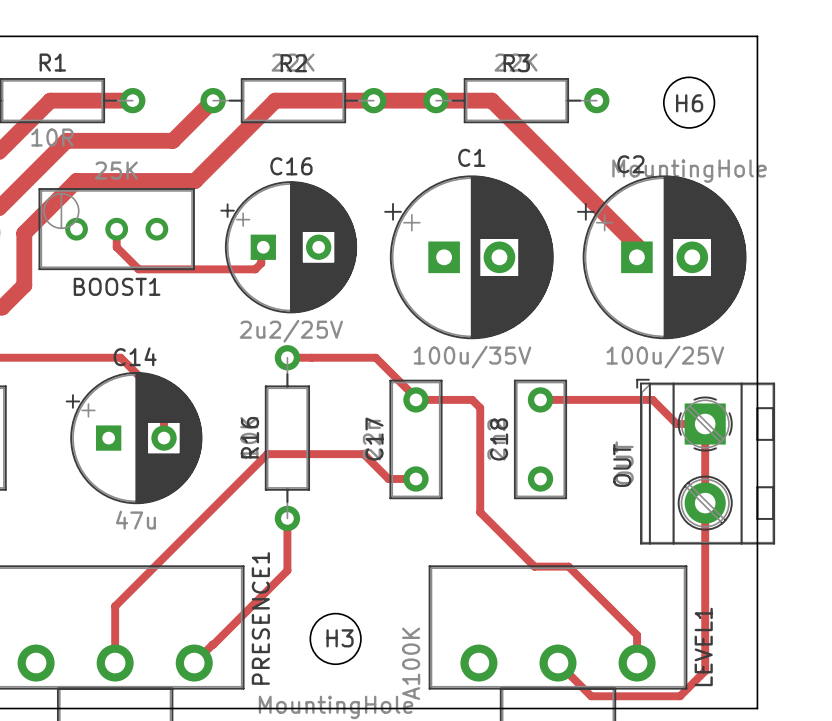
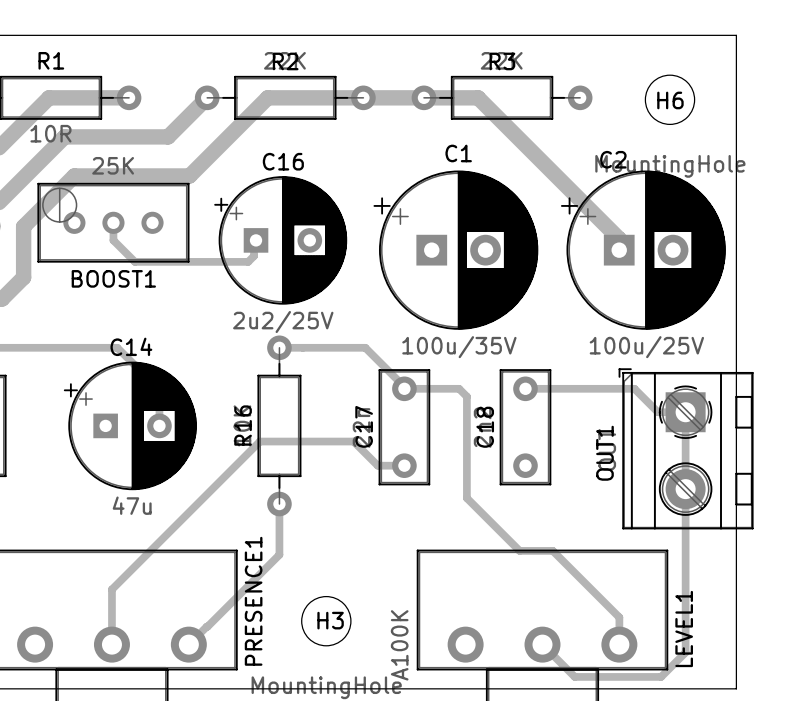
OUT name: OUT (622, 465) -> OUT1 (604, 453)

